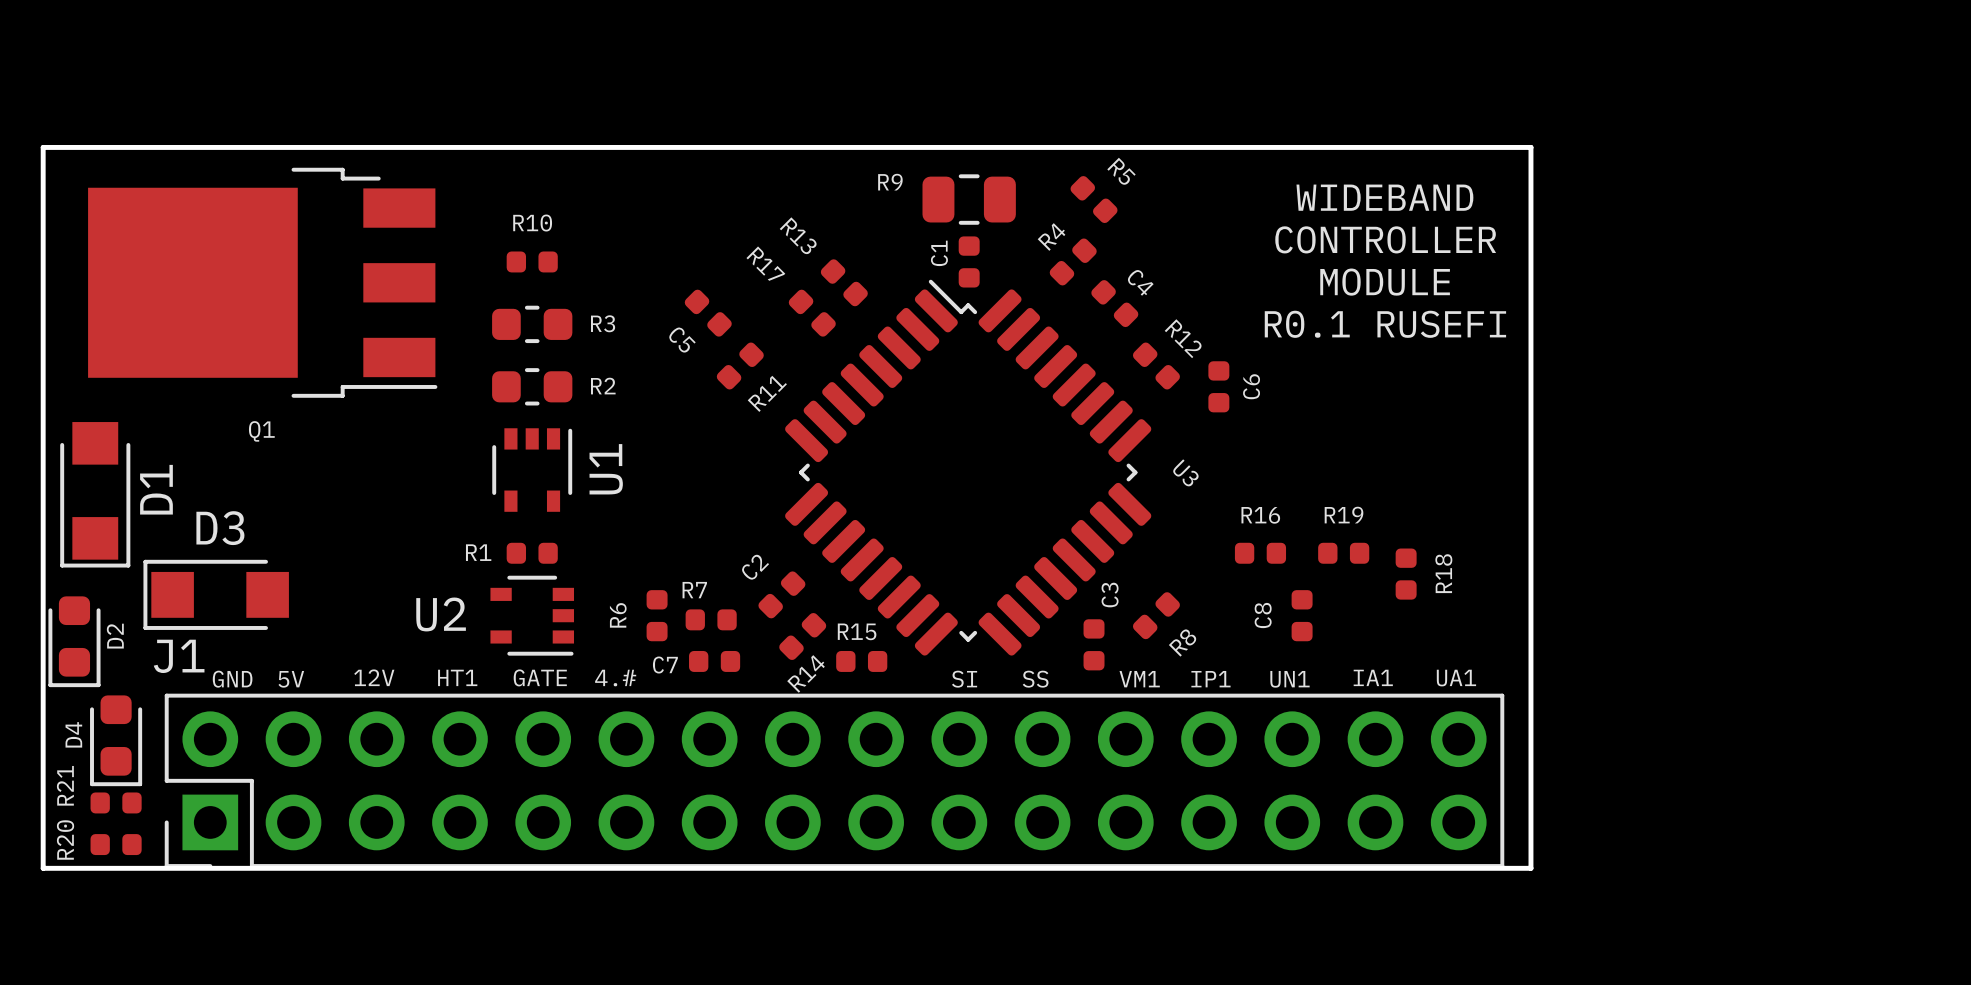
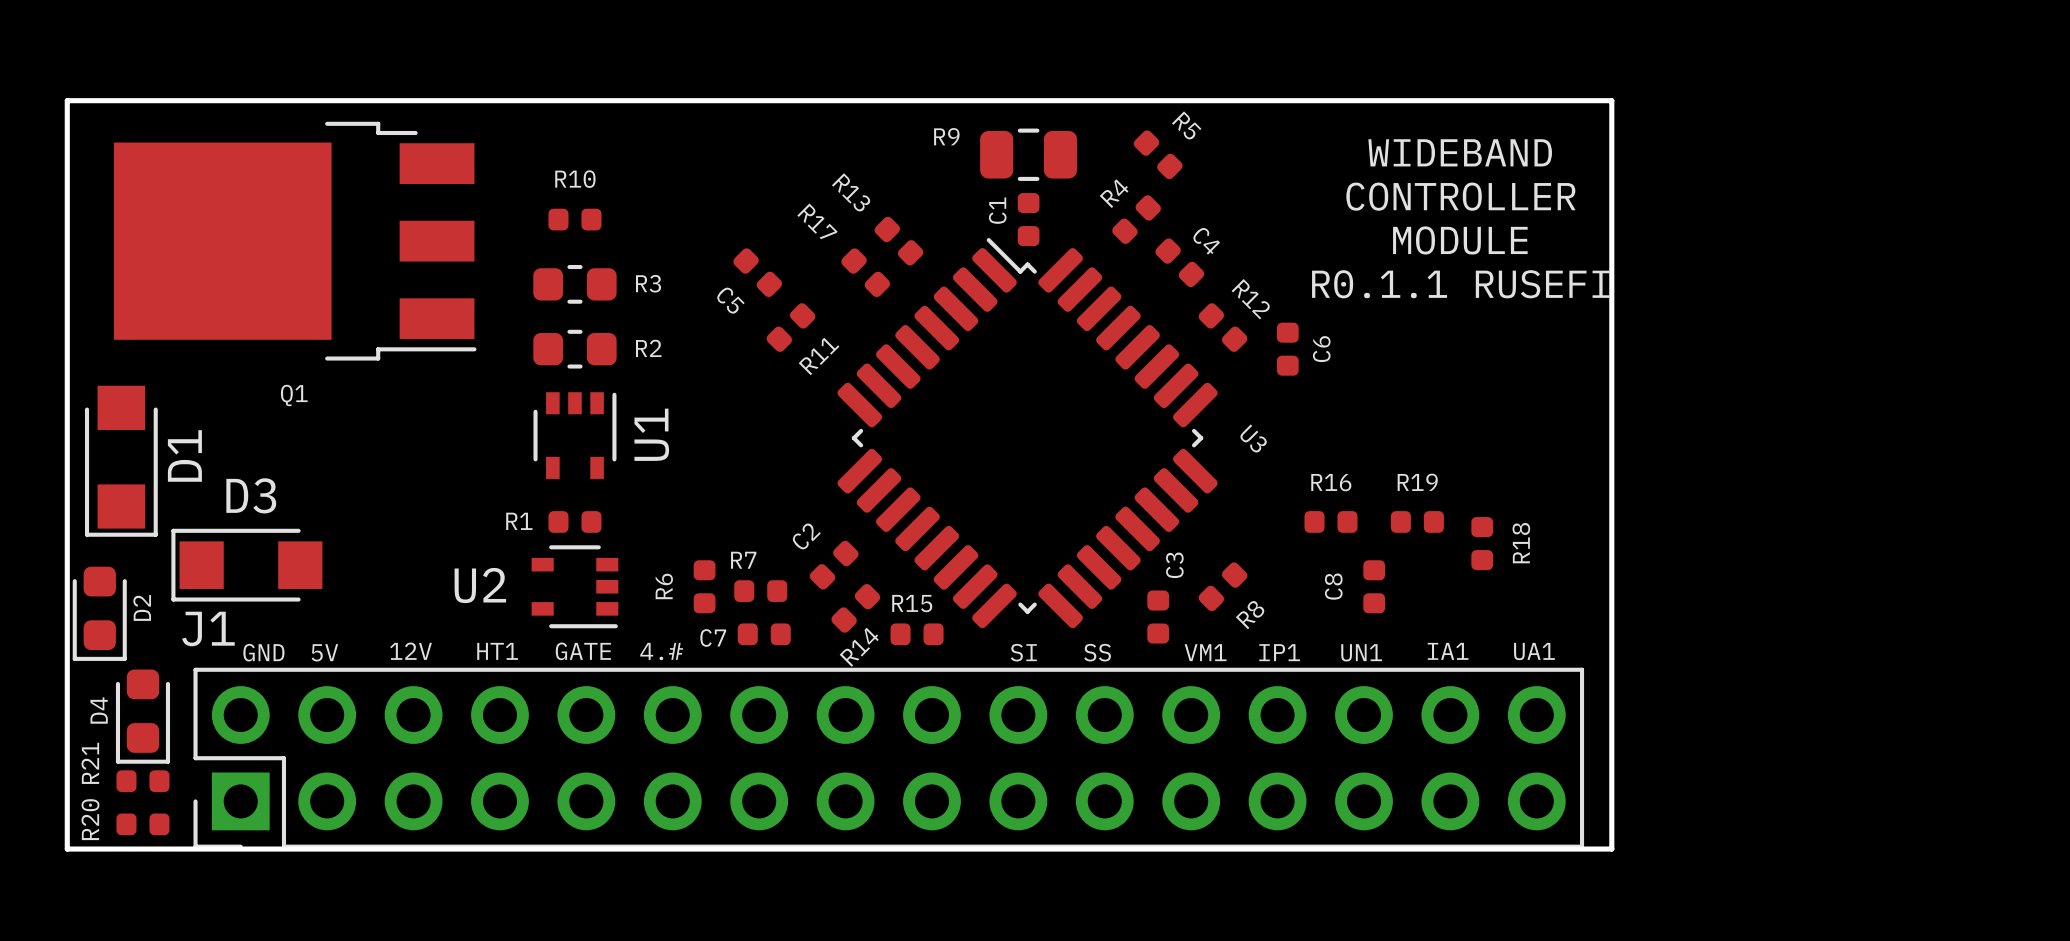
text: R0.1 RUSEFI (1385, 324) -> R0.1.1 RUSEFI (1460, 284)

